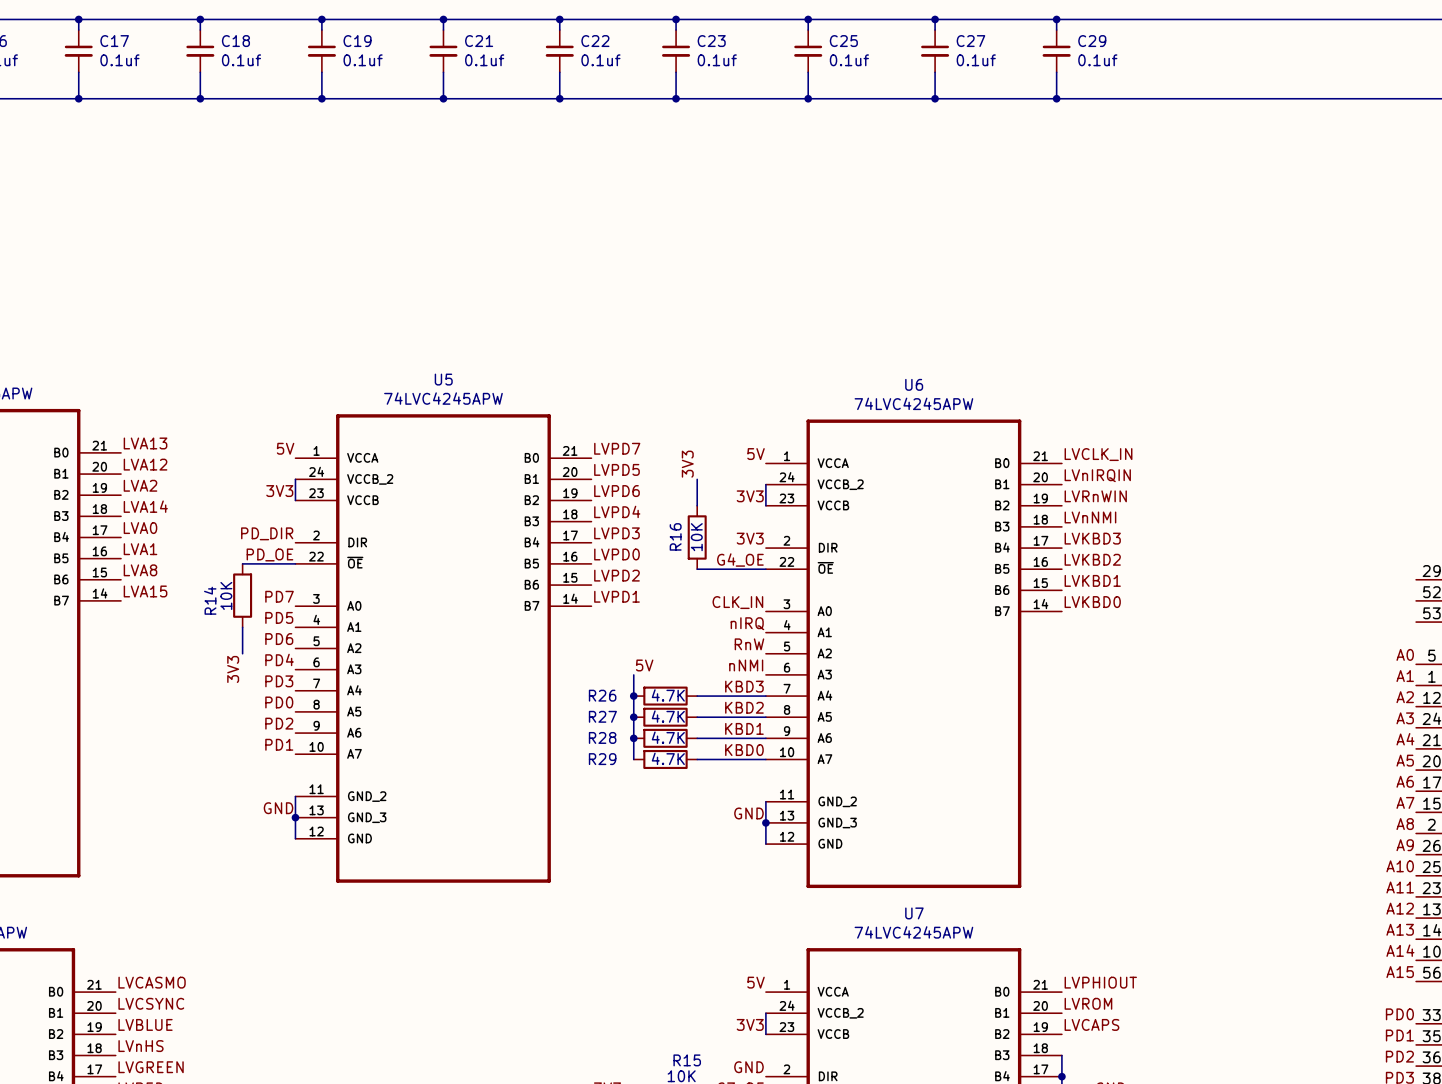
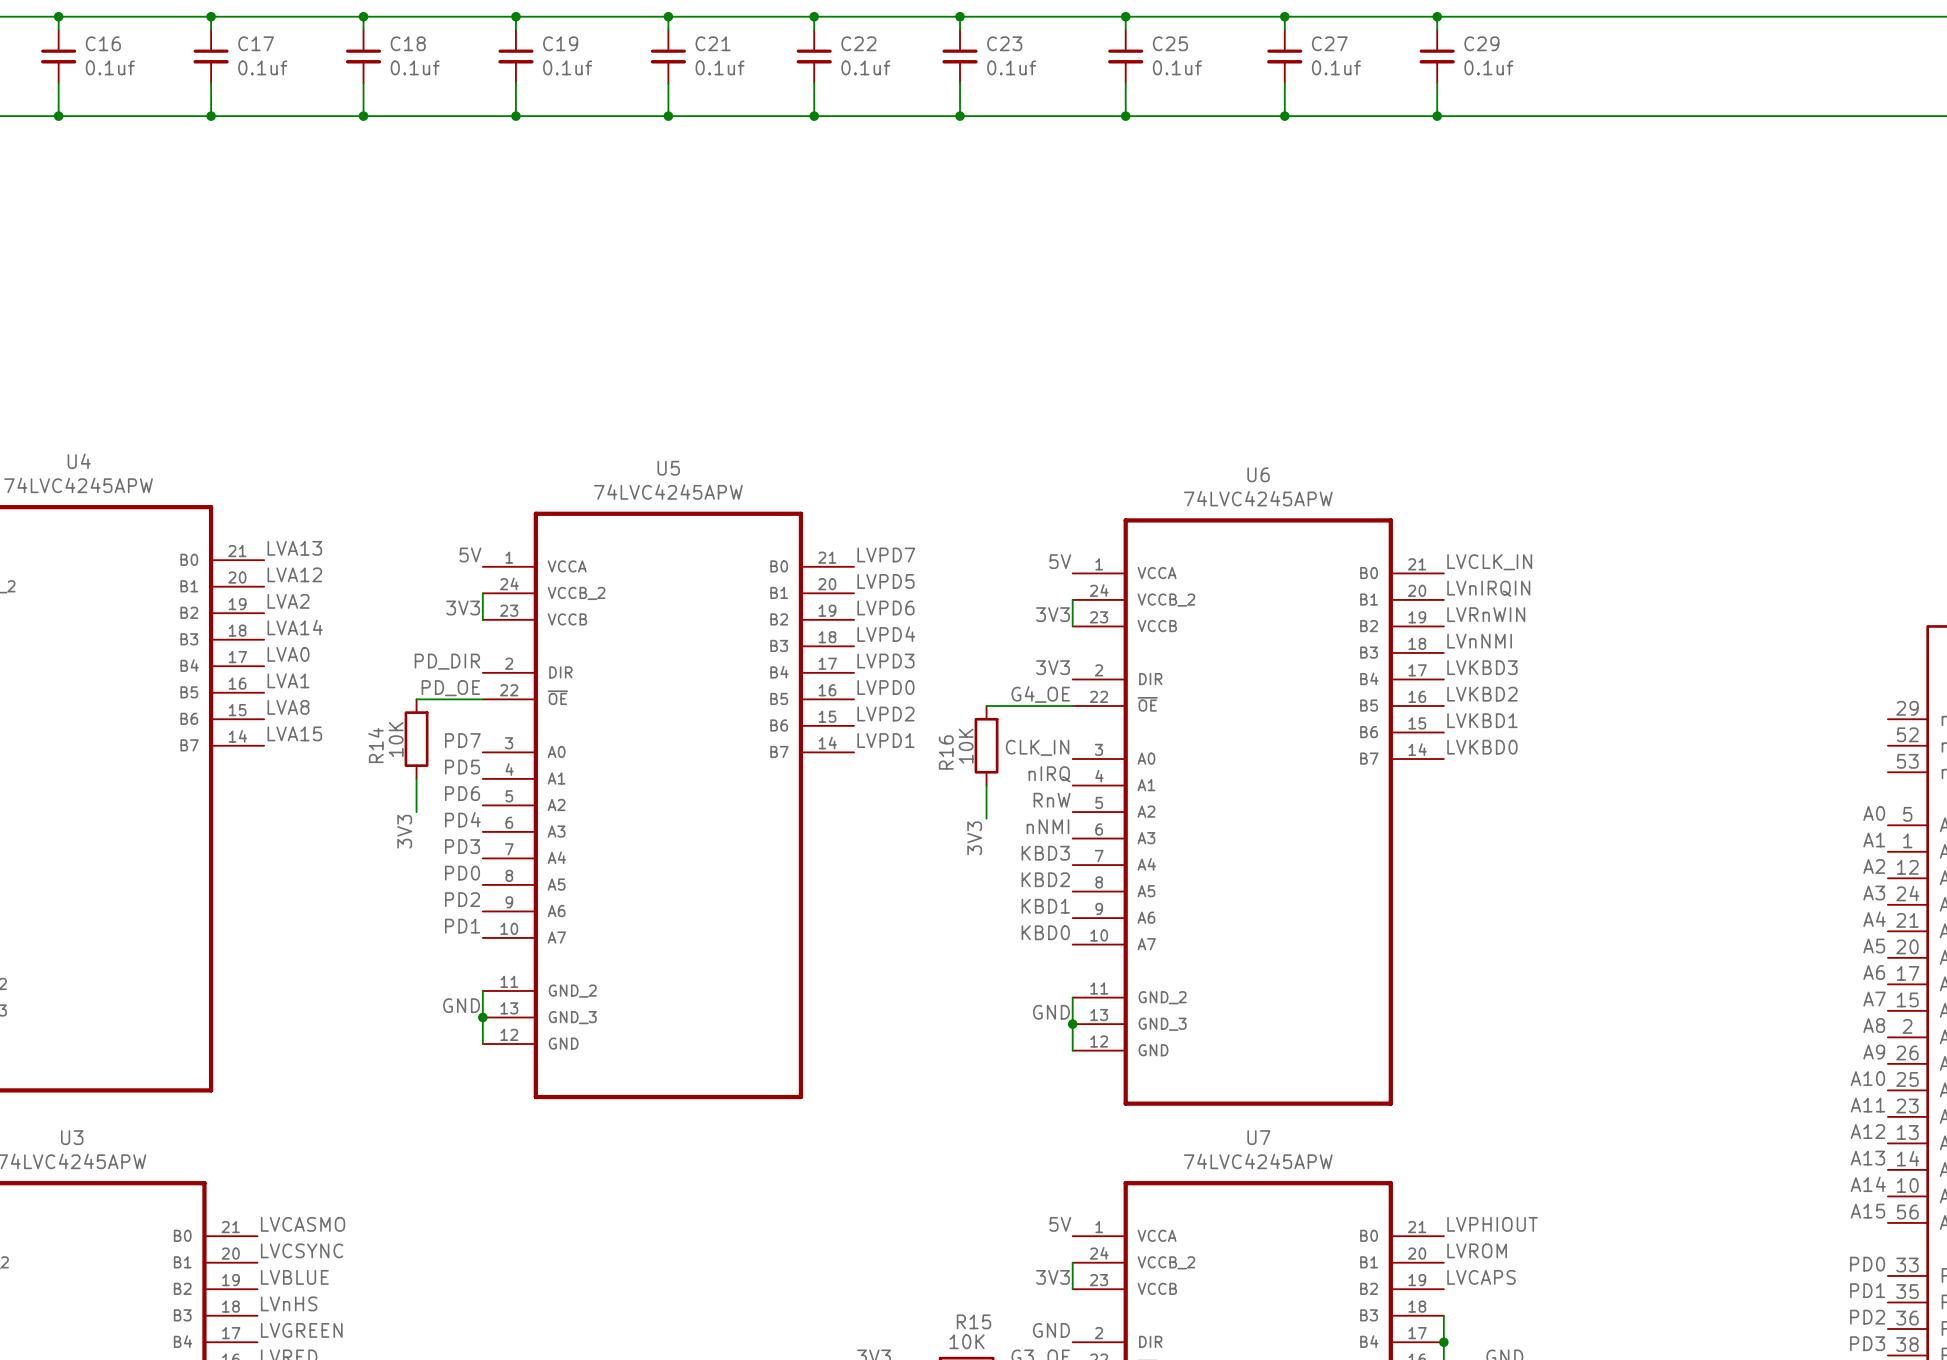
label position: 3V3 (687, 464) -> 3V3 (974, 838)
wire: (697, 479) (697, 505) -> (986, 785) (986, 818)
R16 name position: R16 (675, 536) -> R16 (946, 752)
R16 value position: 10K (696, 537) -> 10K (966, 746)
R16 position: (697, 537) -> (986, 745)
label: 5V (644, 665) -> none
wire: (633, 674) (633, 759) -> none
junction: (633, 696) -> none
R26: 4.7K (665, 696) -> none
wire: (697, 696) (765, 696) -> none
junction: (633, 717) -> none
R27: 4.7K (665, 717) -> none
wire: (697, 717) (765, 717) -> none
junction: (633, 738) -> none
R28: 4.7K (665, 738) -> none
wire: (697, 738) (765, 738) -> none
R29: 4.7K (665, 759) -> none
wire: (697, 759) (765, 759) -> none

